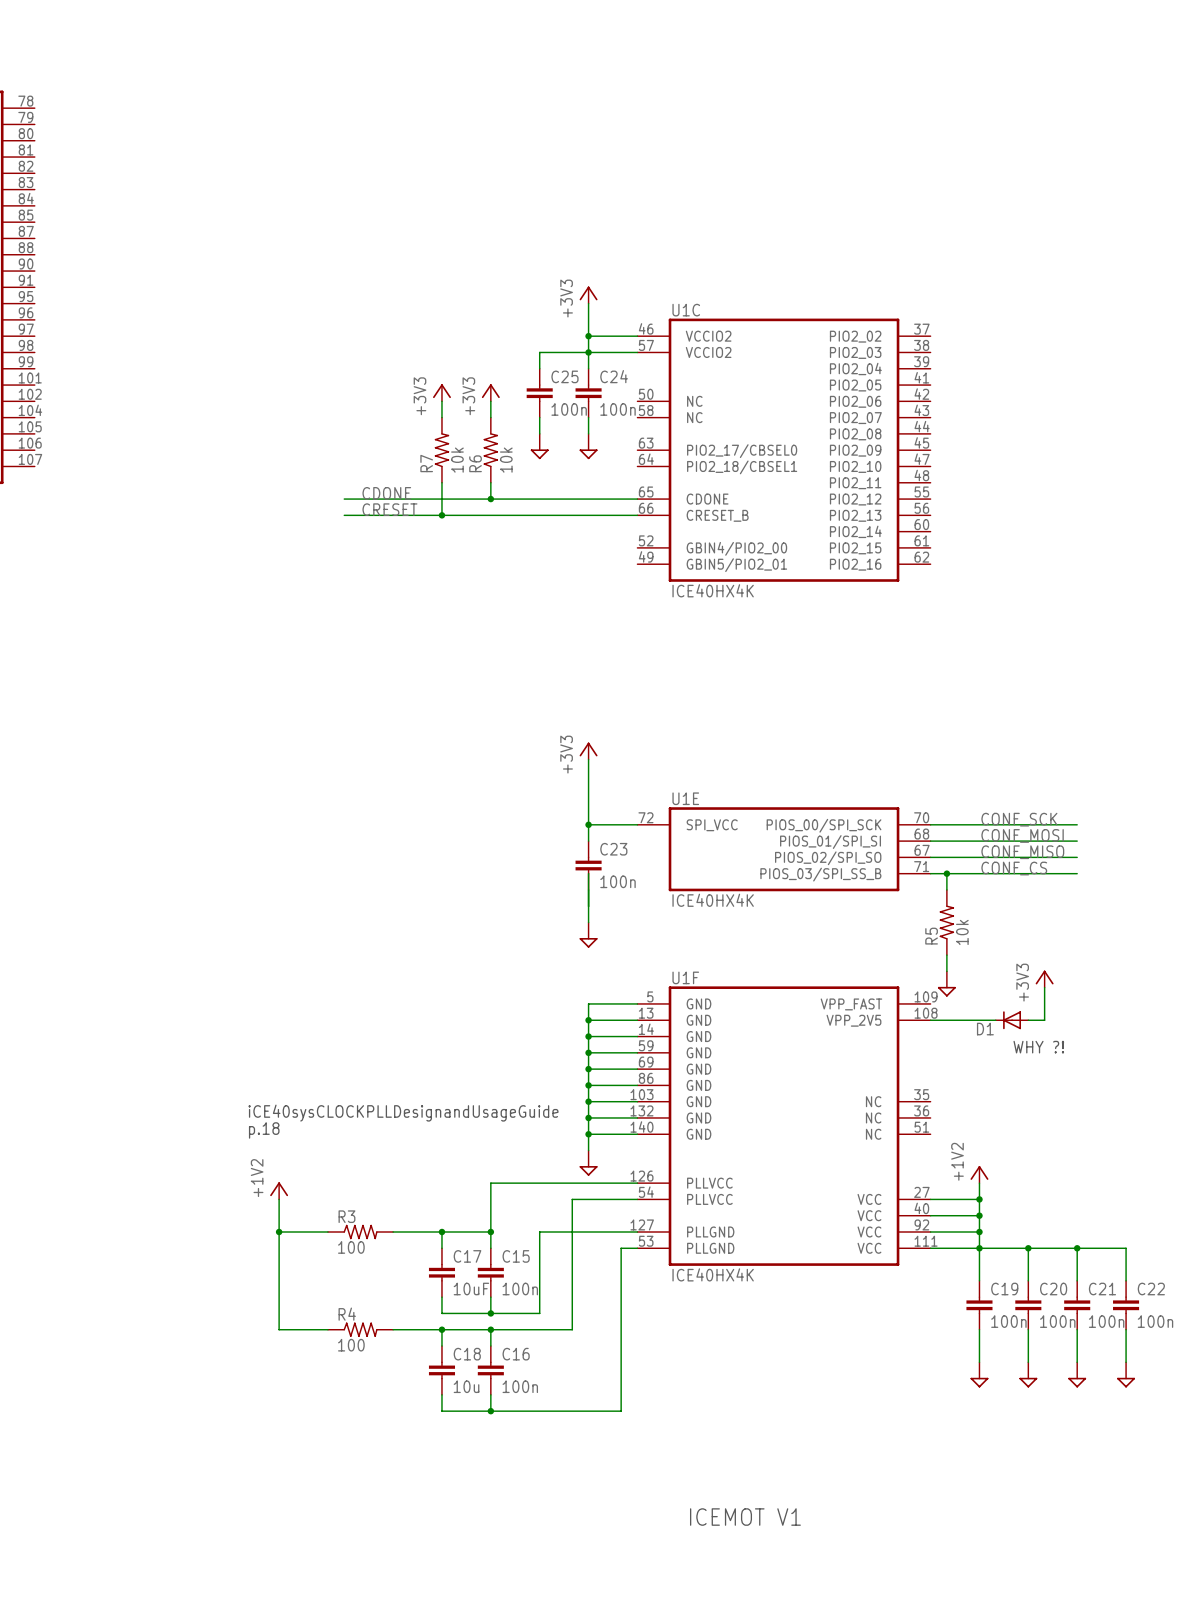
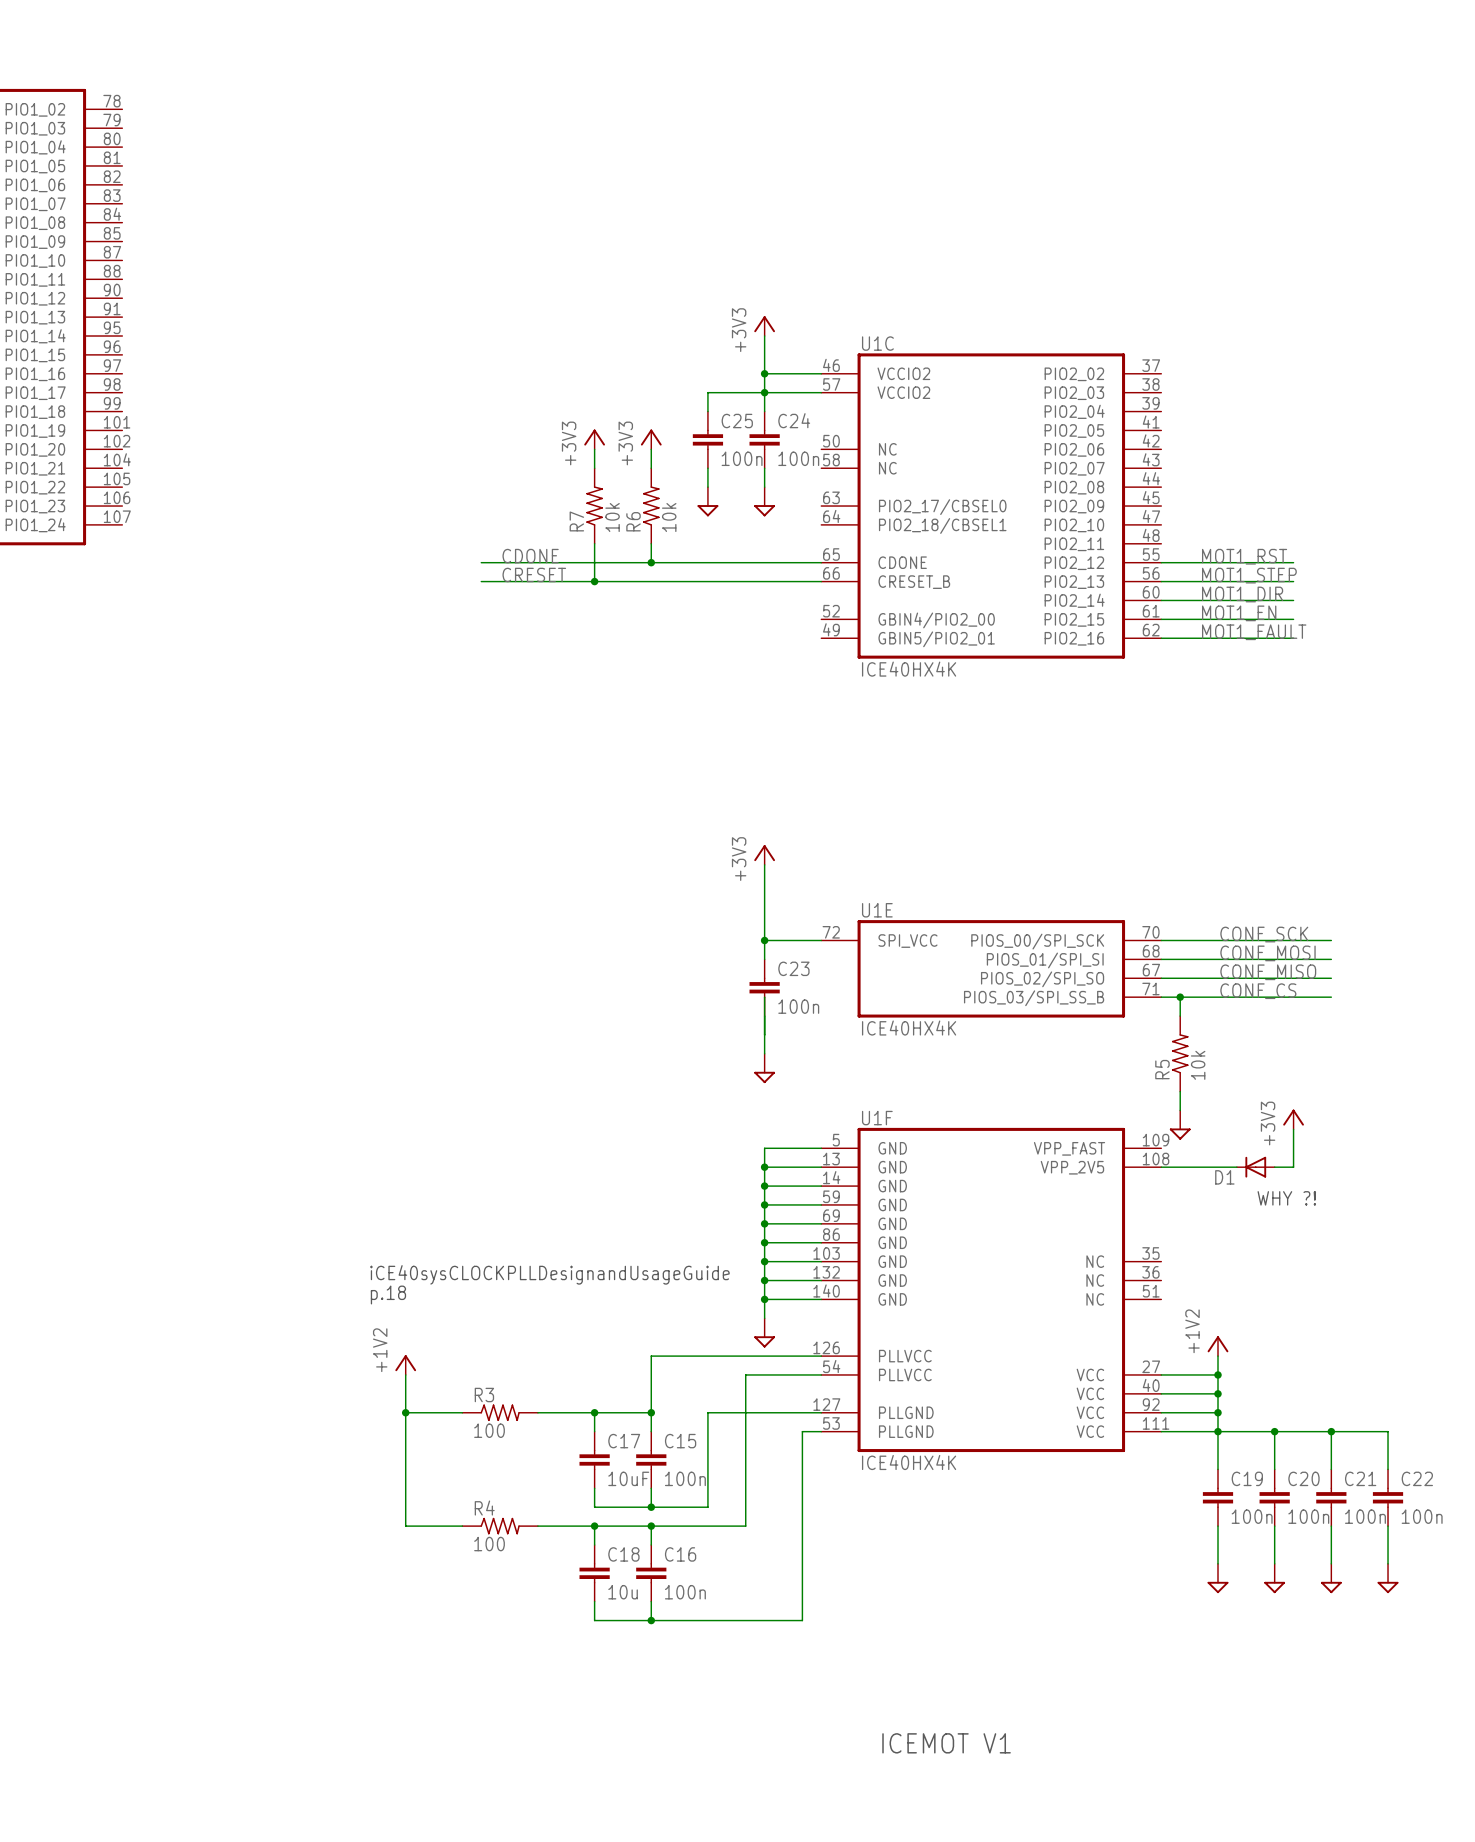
label: none -> MOT1_RST (1244, 556)
wire: none -> (1161, 562) (1293, 562)
label: none -> MOT1_STEP (1249, 575)
wire: none -> (1161, 581) (1293, 581)
label: none -> MOT1_DIR (1242, 594)
wire: none -> (1161, 600) (1293, 600)
label: none -> MOT1_EN (1239, 613)
wire: none -> (1161, 619) (1293, 619)
label: none -> MOT1_FAULT (1254, 632)
wire: none -> (1161, 638) (1293, 638)

